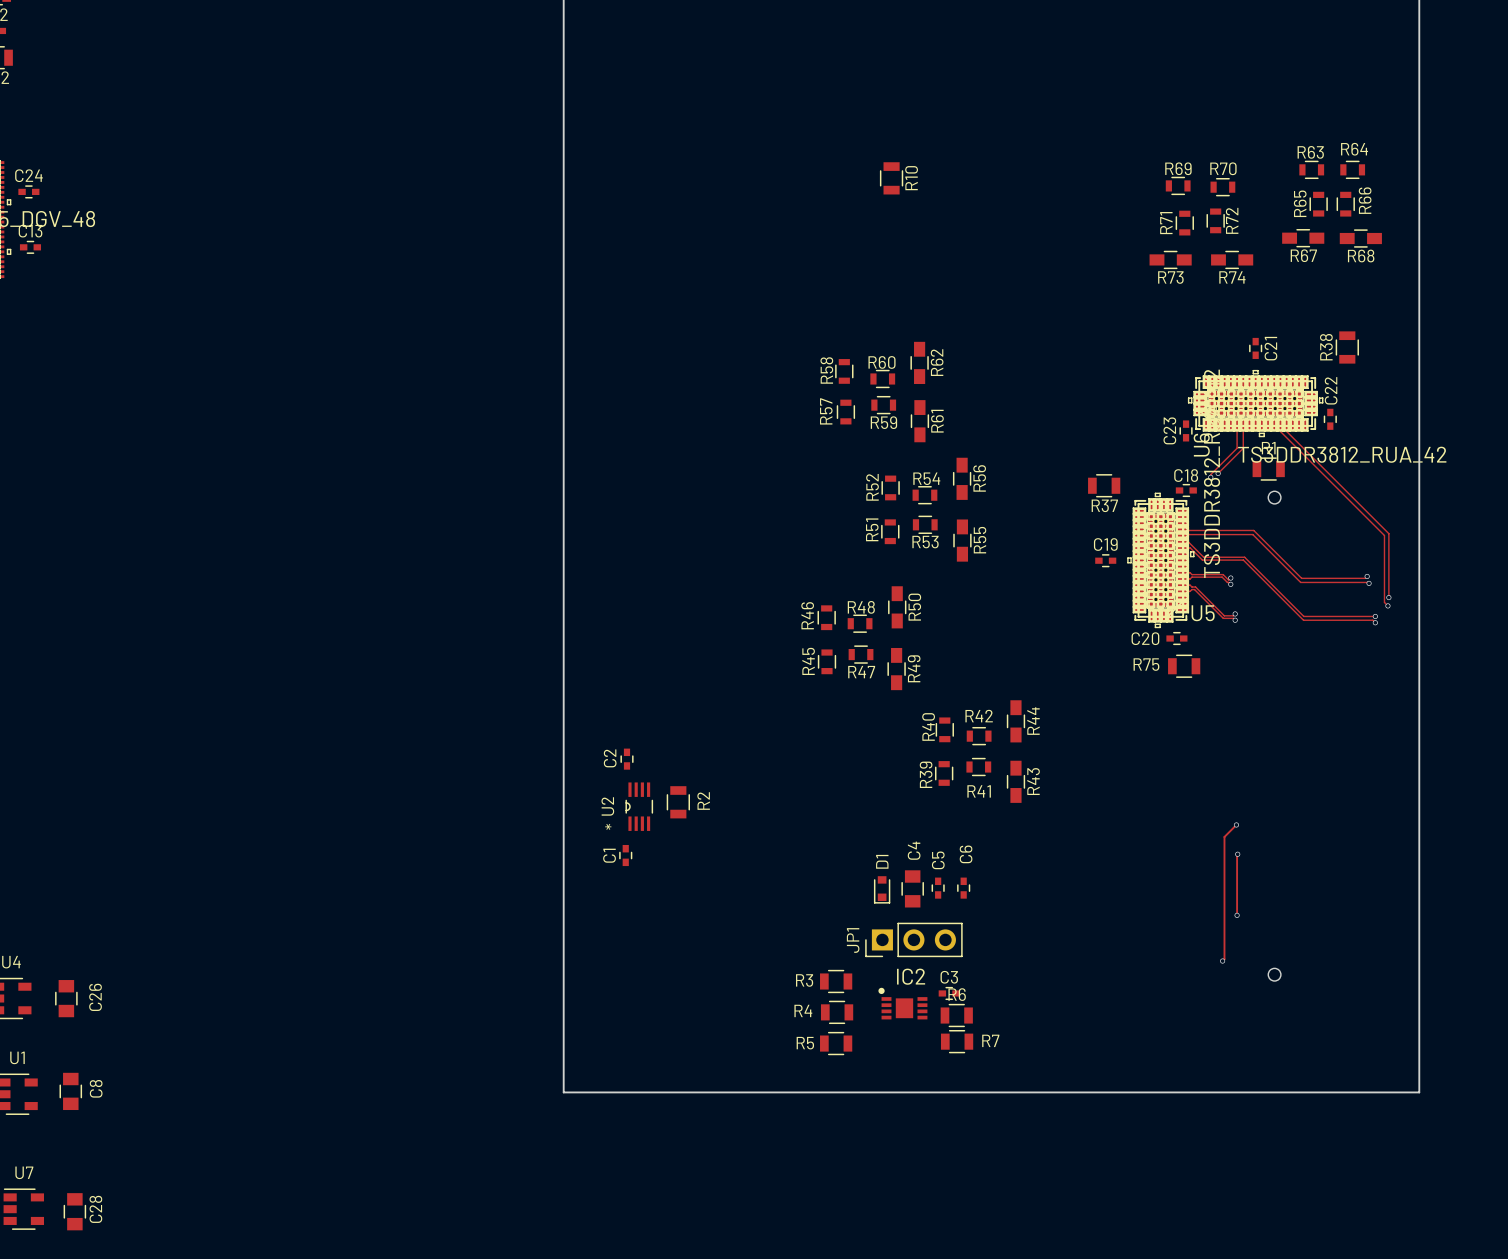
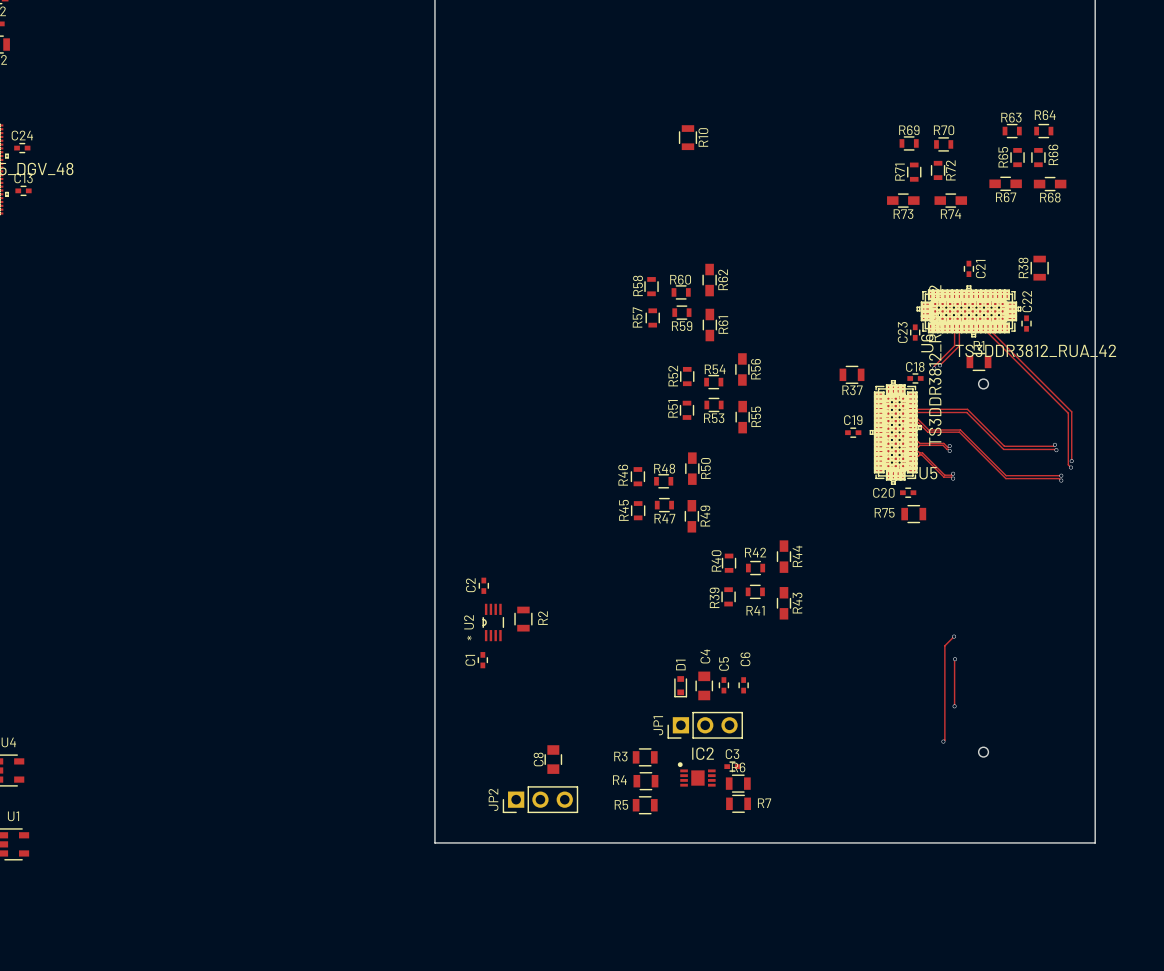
C26: (66, 998) -> none
JP2: none -> (540, 799)
C8 name position: C8 (96, 1088) -> C8 (538, 759)
C8 position: (70, 1091) -> (553, 759)
U7: (23, 1209) -> none
C28: (74, 1211) -> none

